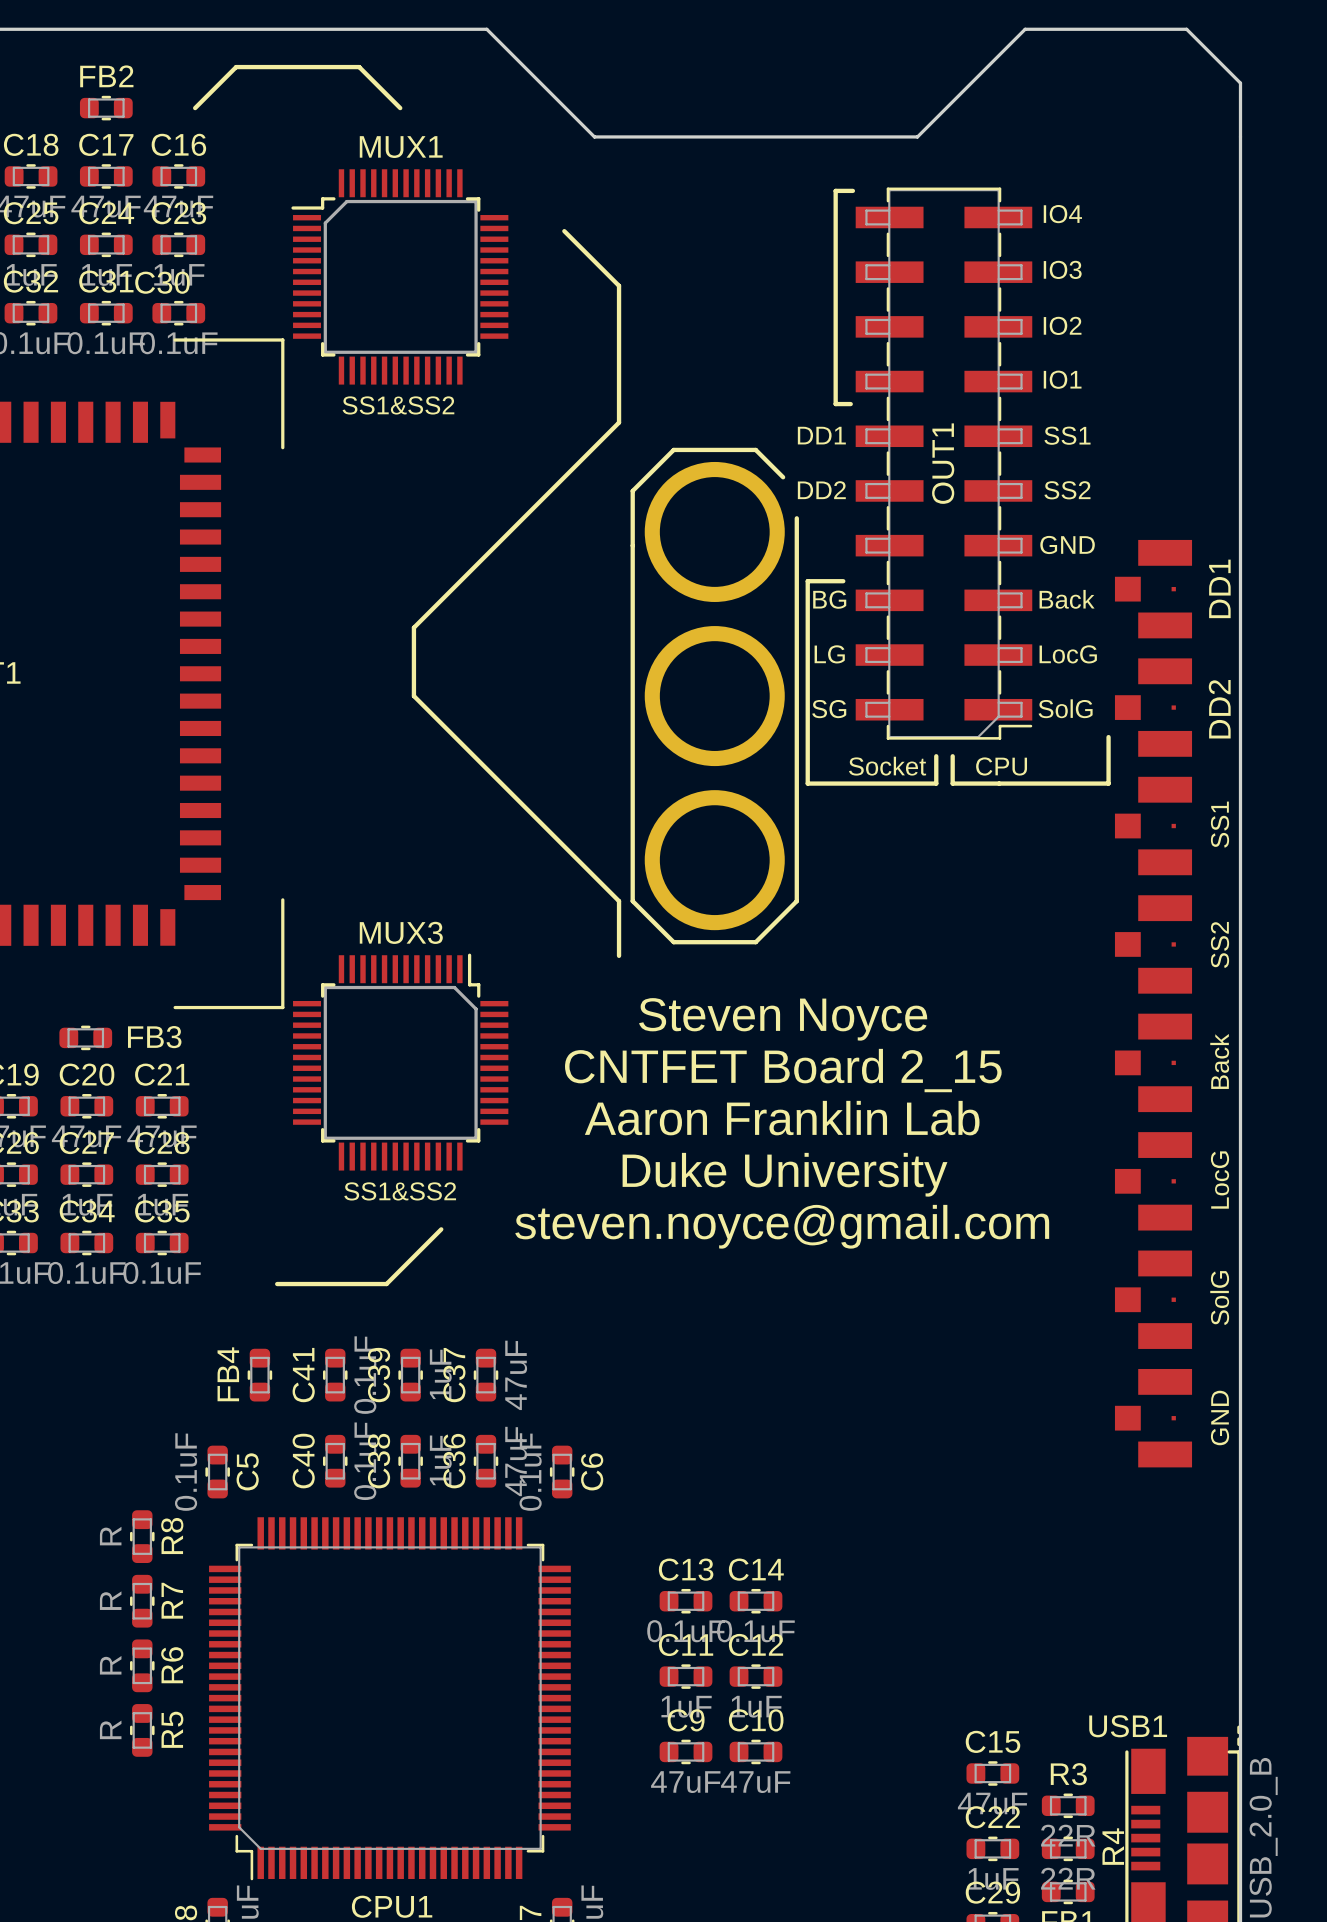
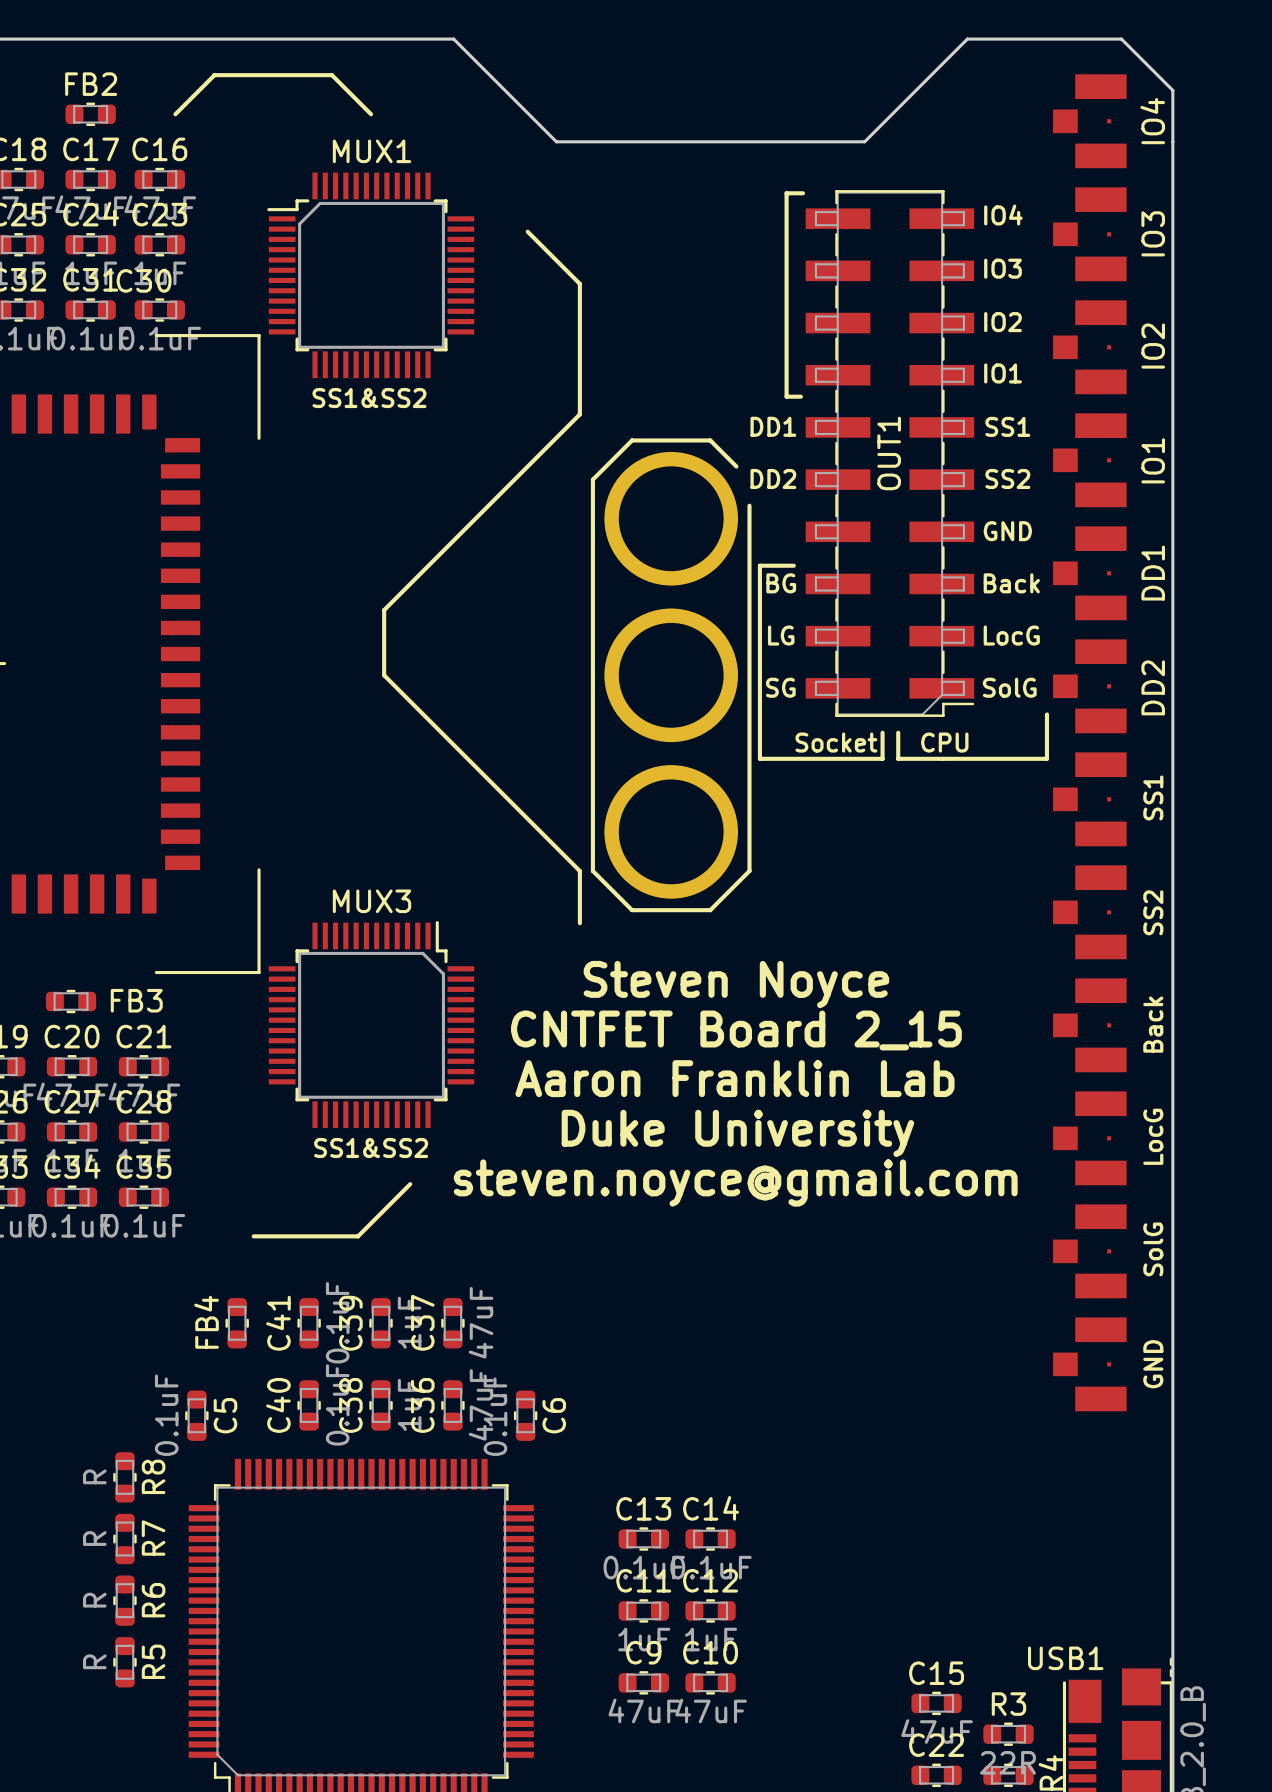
part: none -> (1089, 121)
text: none -> IO4 (1152, 121)
part: none -> (1089, 234)
text: none -> IO3 (1153, 233)
text: none -> IO2 (1153, 346)
part: none -> (1089, 347)
part: none -> (1089, 460)
text: none -> IO1 (1153, 460)

